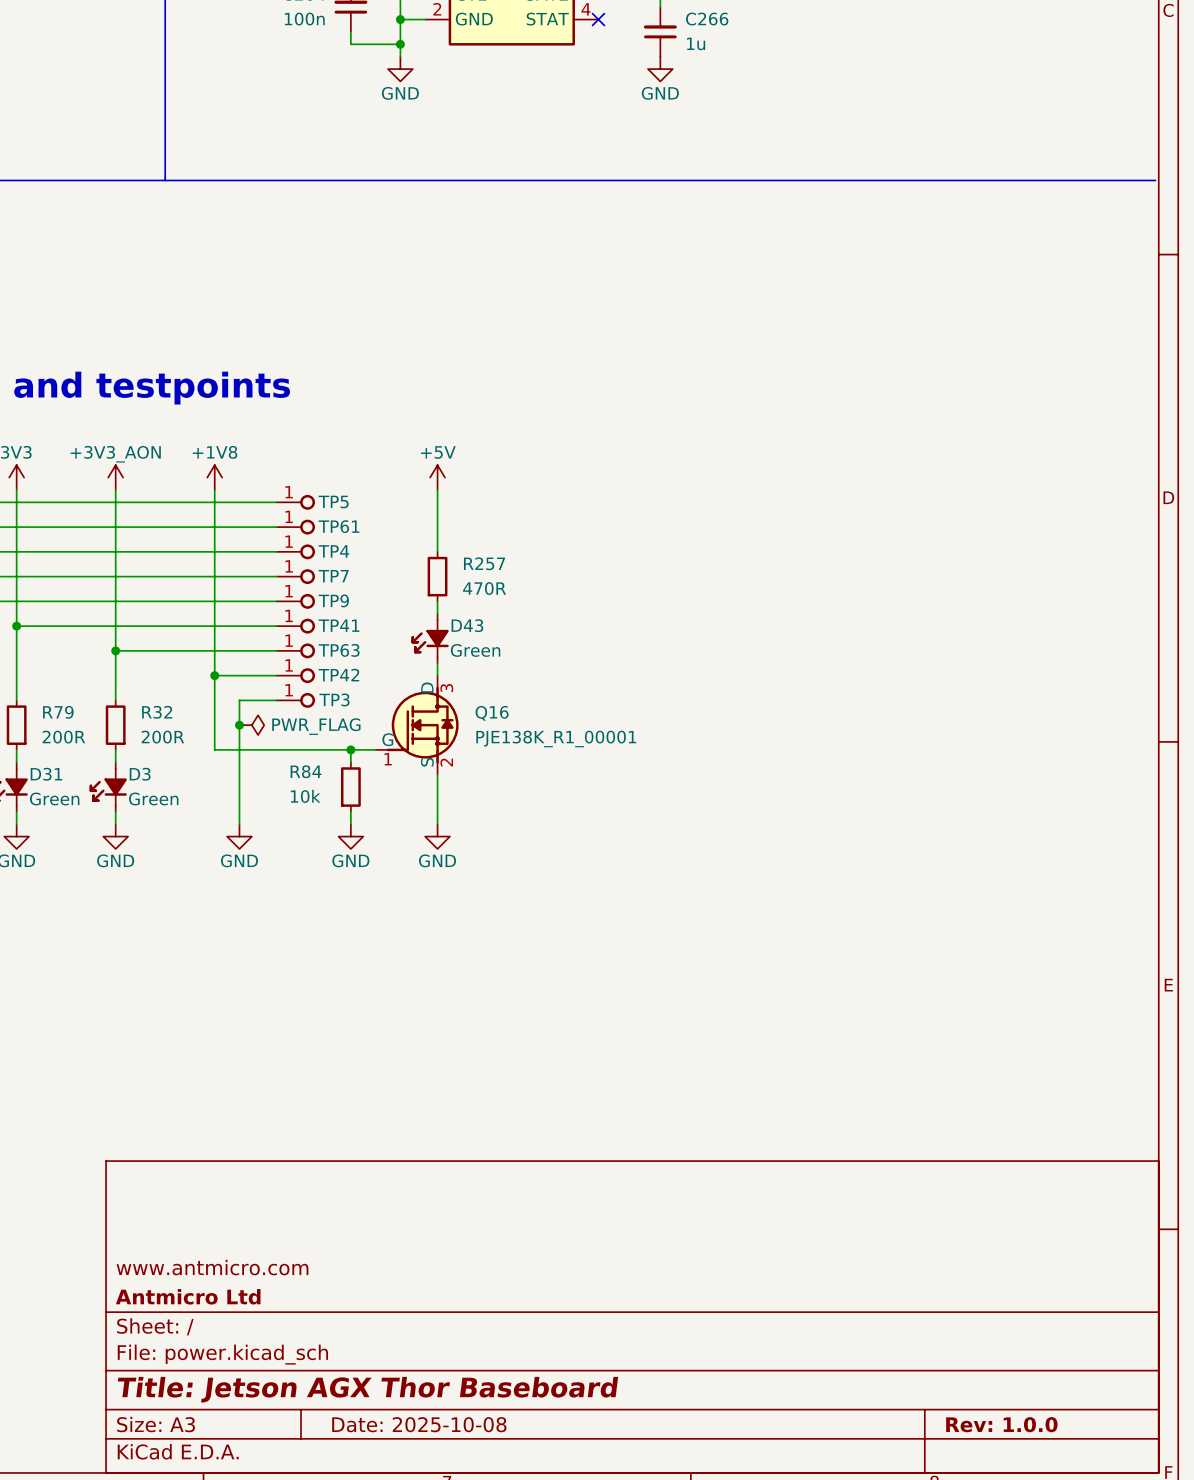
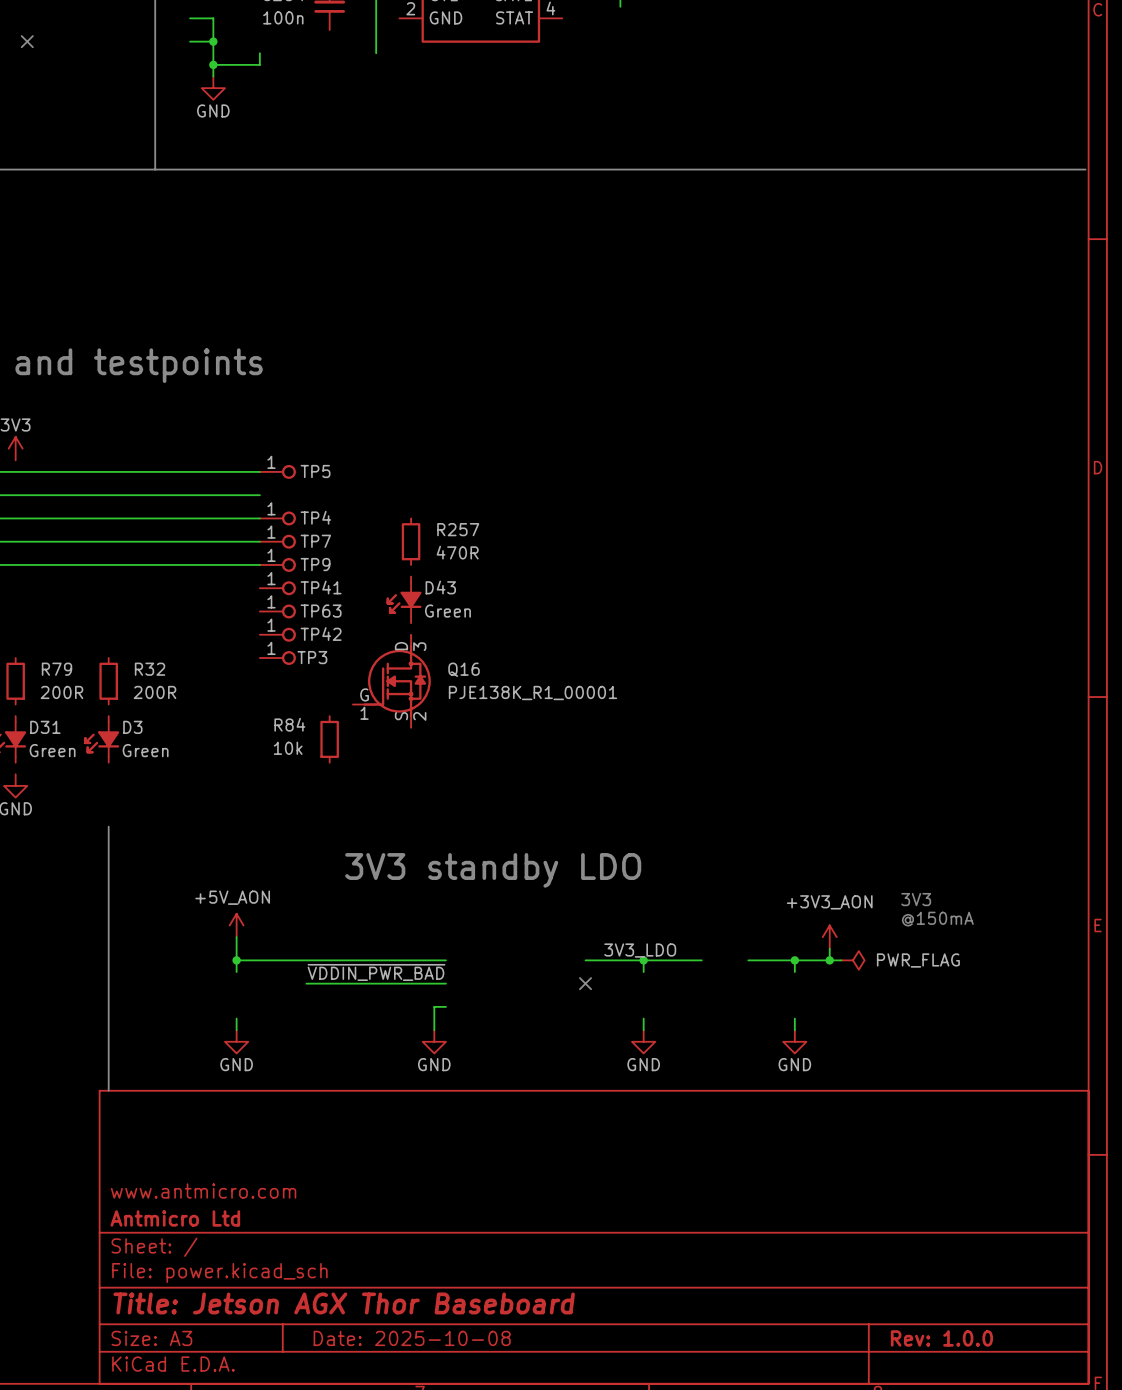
wire: none -> (190, 18) (213, 18) (213, 76)
wire: (400, 19) (425, 19) -> (190, 41) (213, 41)
junction: (400, 19) -> none
no-connect mark: (598, 19) -> none
wire: (350, 31) (350, 44) (400, 44) -> none
C266: (660, 31) -> none
no-connect mark: none -> (27, 41)
junction: none -> (213, 41)
junction: (400, 44) -> none
wire: none -> (259, 53) (259, 64) (213, 64)
junction: none -> (213, 64)
power symbol: GND (400, 69) -> none
power symbol: GND (660, 69) -> none
power symbol: none -> GND (213, 88)
power symbol: +3V3_AON (115, 477) -> none
power symbol: +1V8 (214, 477) -> none
power symbol: +5V (437, 477) -> none
wire: (16, 489) (16, 700) -> none
wire: (115, 489) (115, 700) -> none
wire: (214, 489) (214, 749) (375, 749) -> none
wire: (437, 489) (437, 551) -> none
TP61: (295, 527) -> none
wire: (437, 601) (437, 613) -> none
wire: (16, 626) (276, 626) -> none
junction: (16, 626) -> none
wire: (115, 650) (276, 650) -> none
junction: (115, 650) -> none
wire: (437, 663) (437, 675) -> none
wire: (214, 675) (276, 675) -> none
junction: (214, 675) -> none
wire: (276, 700) (239, 700) (239, 824) -> none
junction: (239, 725) -> none
power symbol: PWR_FLAG (251, 725) -> none
wire: (16, 749) (16, 762) -> none
wire: (115, 749) (115, 762) -> none
wire: (350, 749) (350, 762) -> none
junction: (350, 749) -> none
wire: (437, 774) (437, 824) -> none
wire: (16, 811) (16, 824) -> none
wire: (115, 811) (115, 824) -> none
wire: (350, 811) (350, 824) -> none
power symbol: GND (115, 836) -> none
power symbol: GND (239, 836) -> none
power symbol: GND (350, 836) -> none
power symbol: GND (437, 836) -> none
line: none -> (108, 826) (108, 1090)
text: none -> 3V3 standby LDO (493, 870)
text: none -> 3V3 (916, 899)
text: none -> @150mA (937, 919)
power symbol: none -> +5V_AON (236, 925)
wire: none -> (236, 937) (236, 972)
power symbol: none -> +3V3_AON (829, 937)
wire: none -> (829, 948) (829, 960)
label: none -> 3V3_LDO (640, 950)
wire: none -> (236, 960) (445, 960)
junction: none -> (236, 960)
wire: none -> (585, 960) (701, 960)
wire: none -> (643, 960) (643, 972)
junction: none -> (643, 960)
wire: none -> (748, 960) (841, 960)
wire: none -> (794, 960) (794, 972)
junction: none -> (794, 960)
junction: none -> (829, 960)
power symbol: none -> PWR_FLAG (852, 960)
label: none -> ~{VDDIN_PWR_BAD} (376, 972)
wire: none -> (306, 983) (445, 983)
no-connect mark: none -> (585, 983)
wire: none -> (445, 1006) (434, 1006) (434, 1030)
wire: none -> (236, 1018) (236, 1030)
wire: none -> (643, 1018) (643, 1030)
wire: none -> (794, 1018) (794, 1030)
power symbol: none -> GND (236, 1041)
power symbol: none -> GND (434, 1041)
power symbol: none -> GND (643, 1041)
power symbol: none -> GND (794, 1041)

